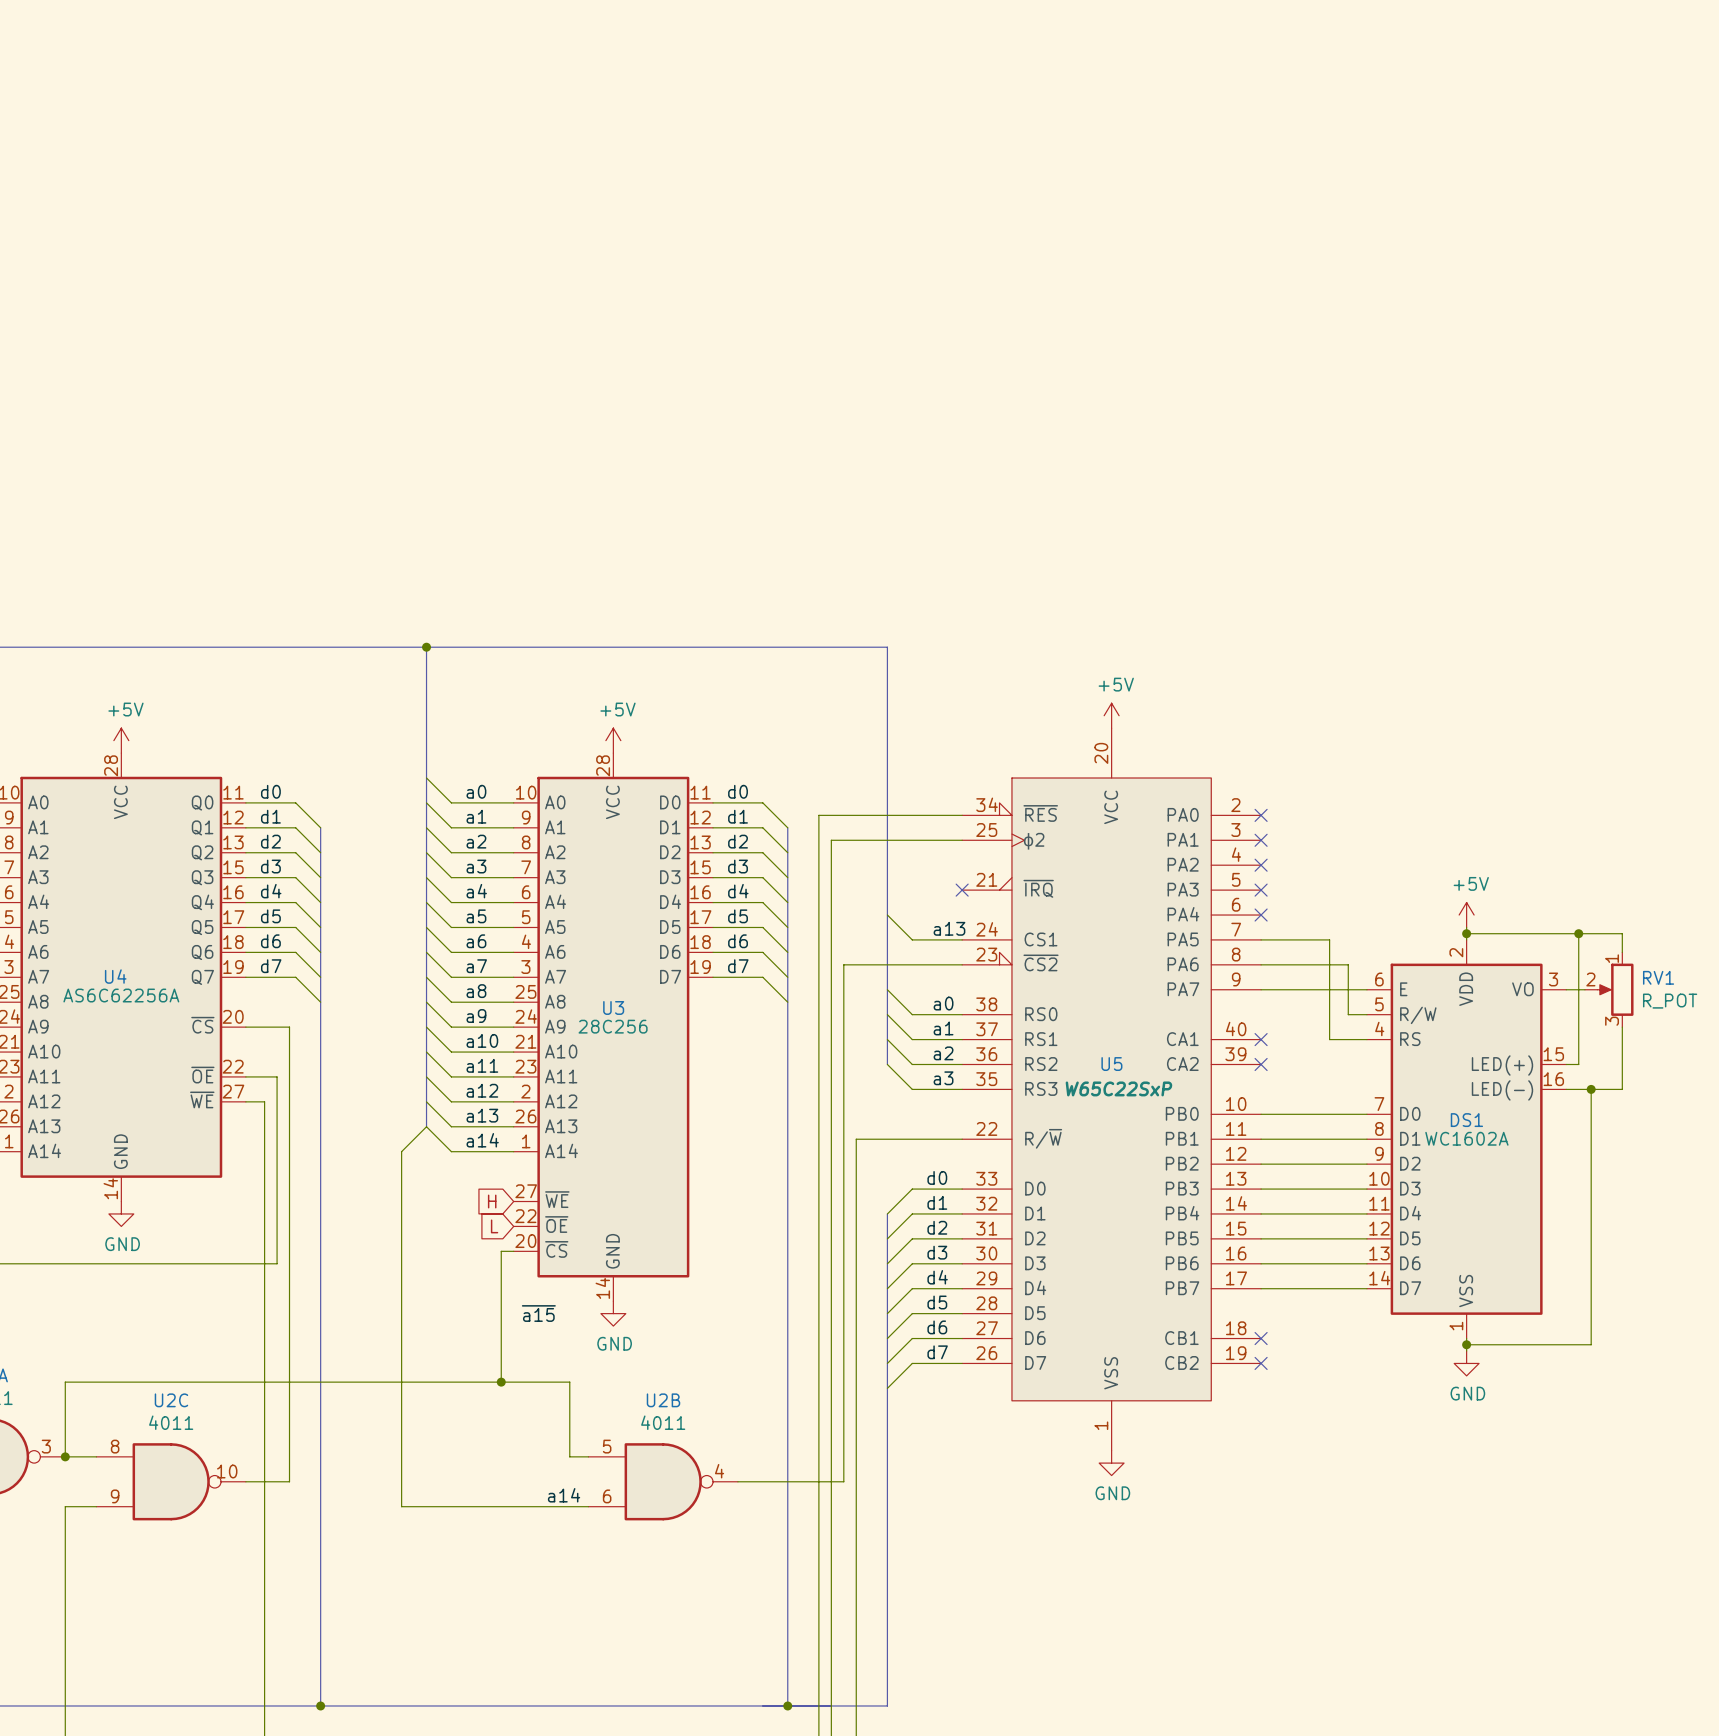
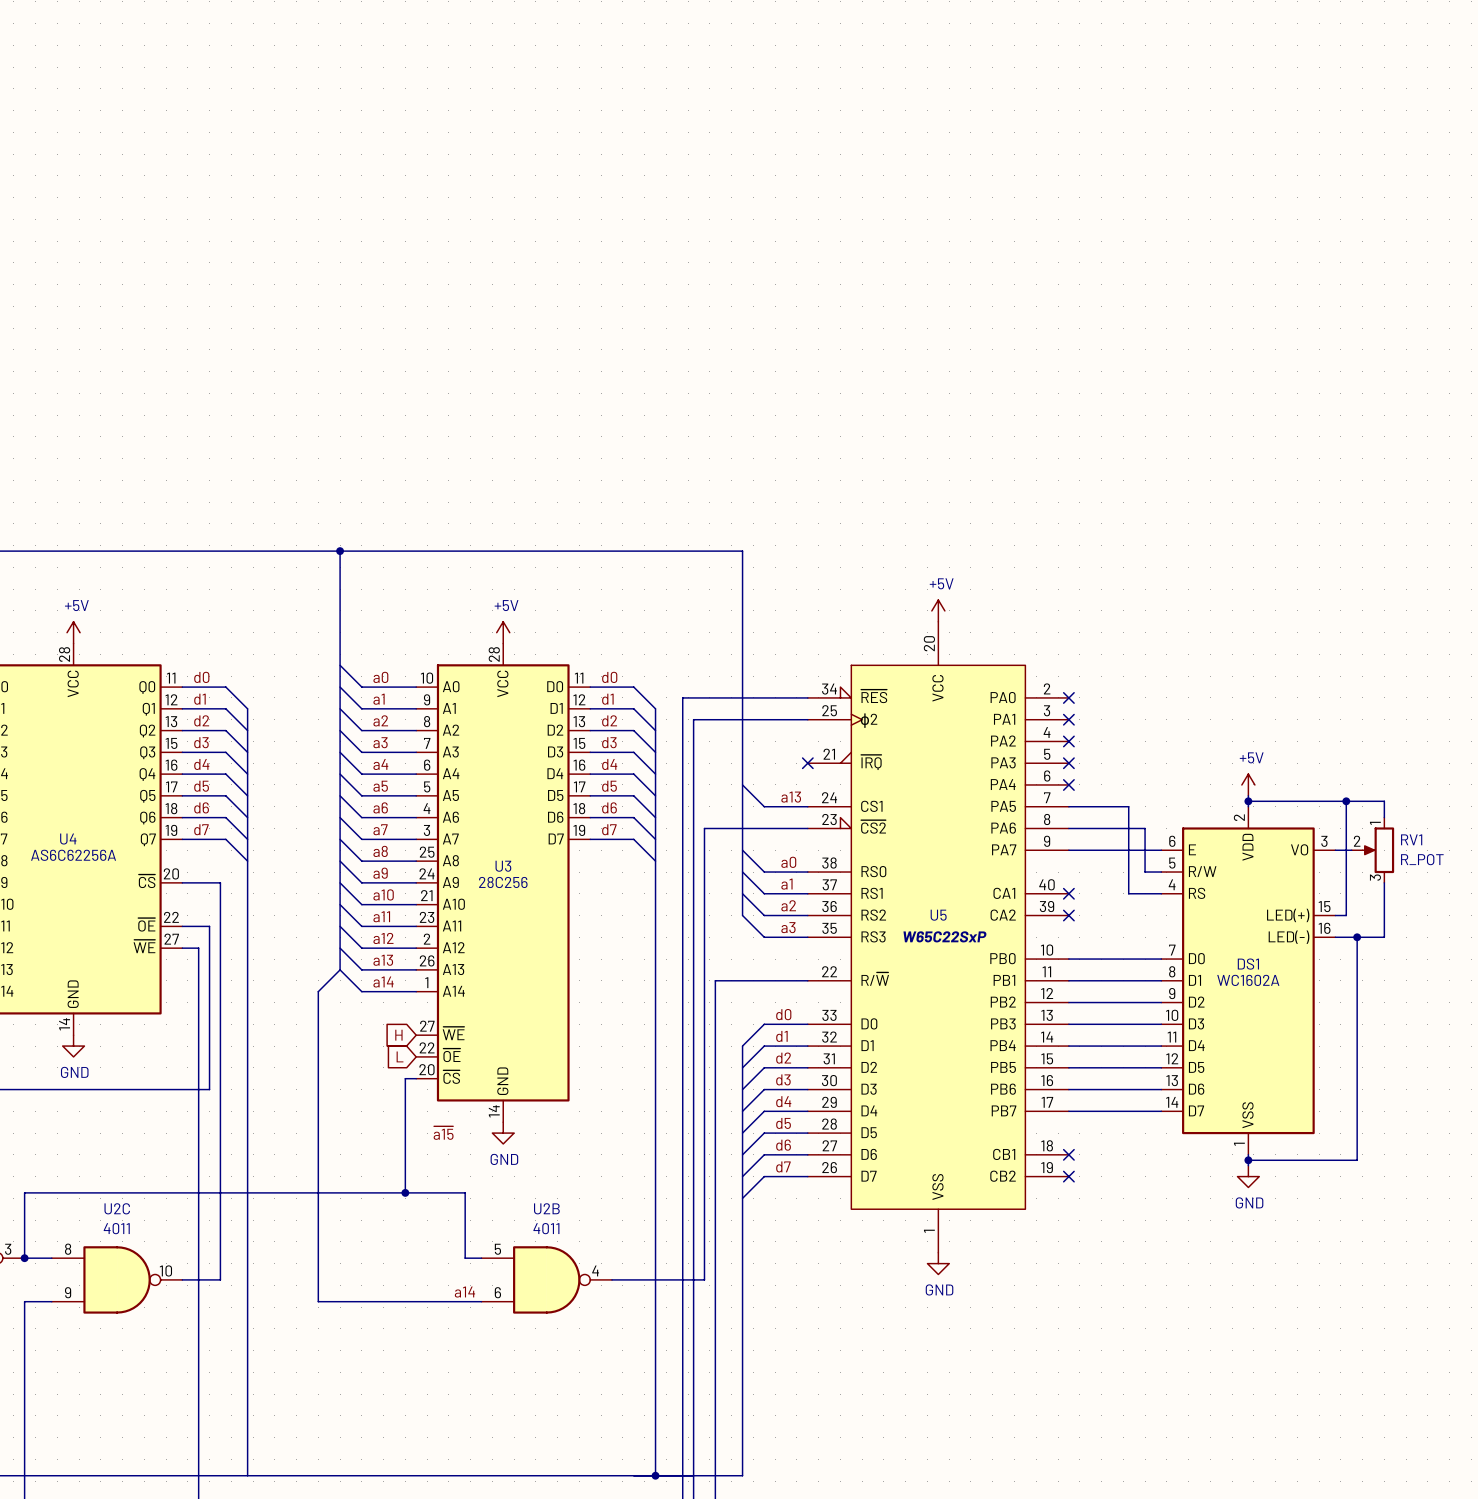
junction: (320, 1705) -> none

